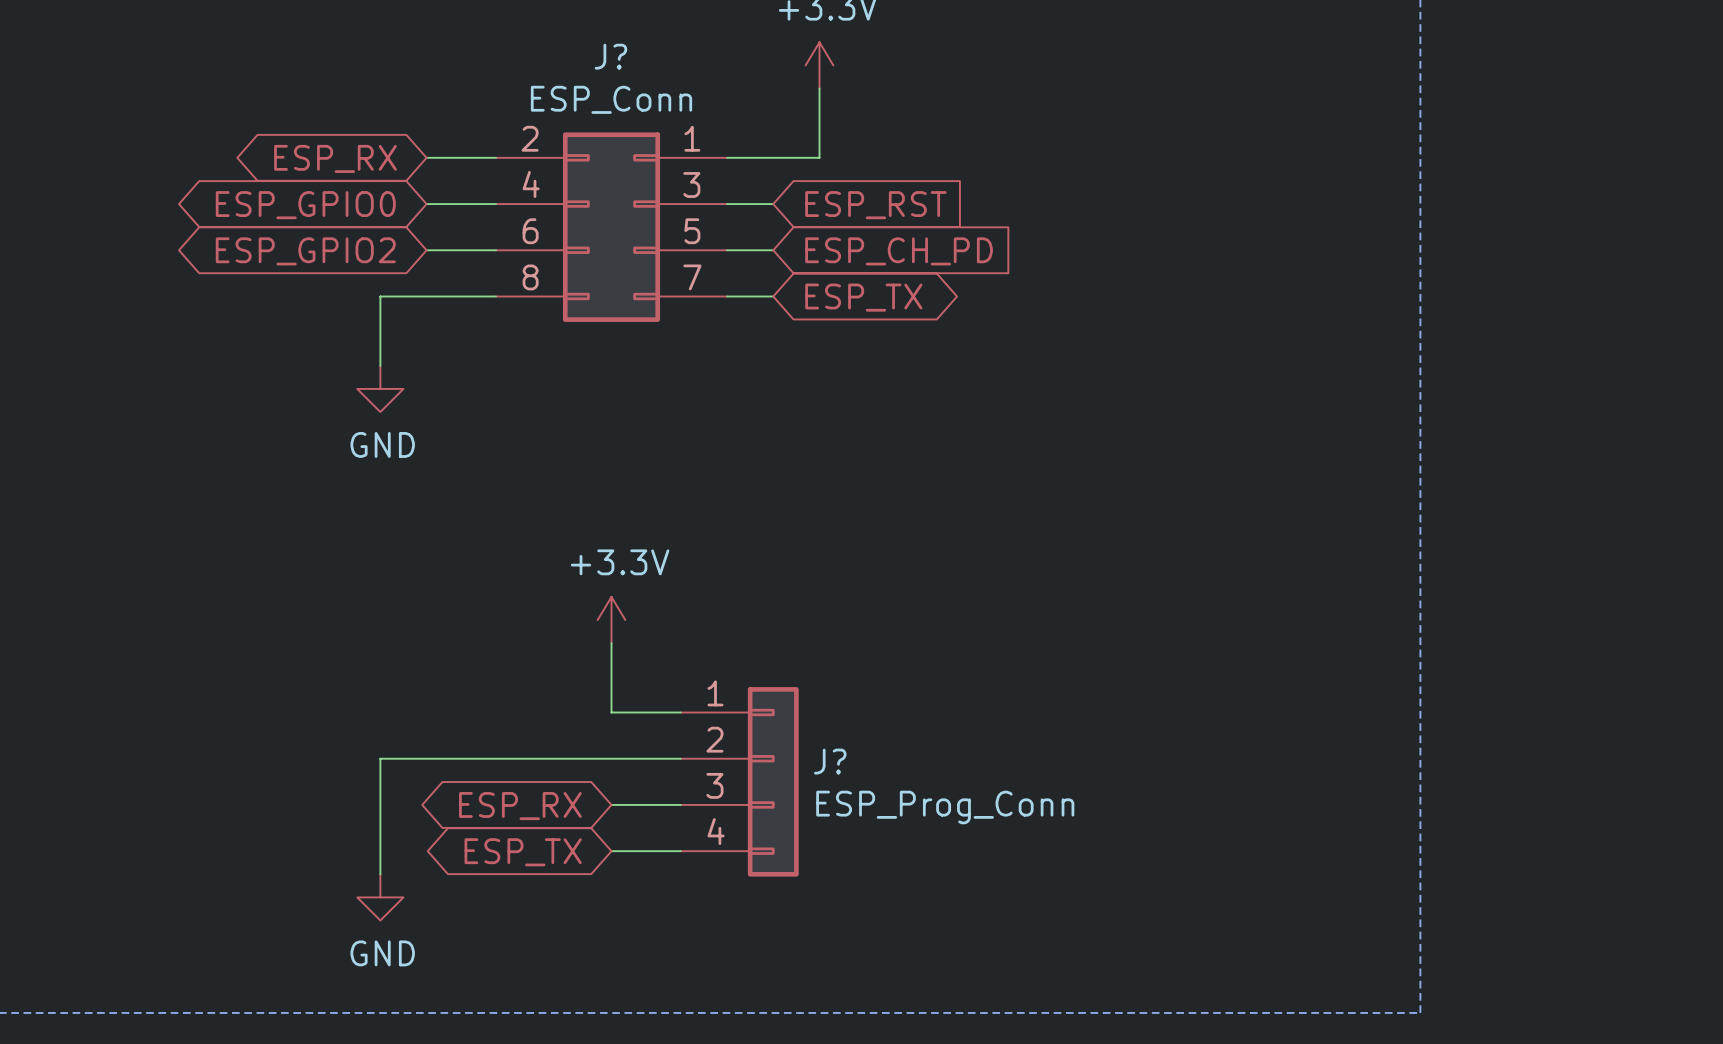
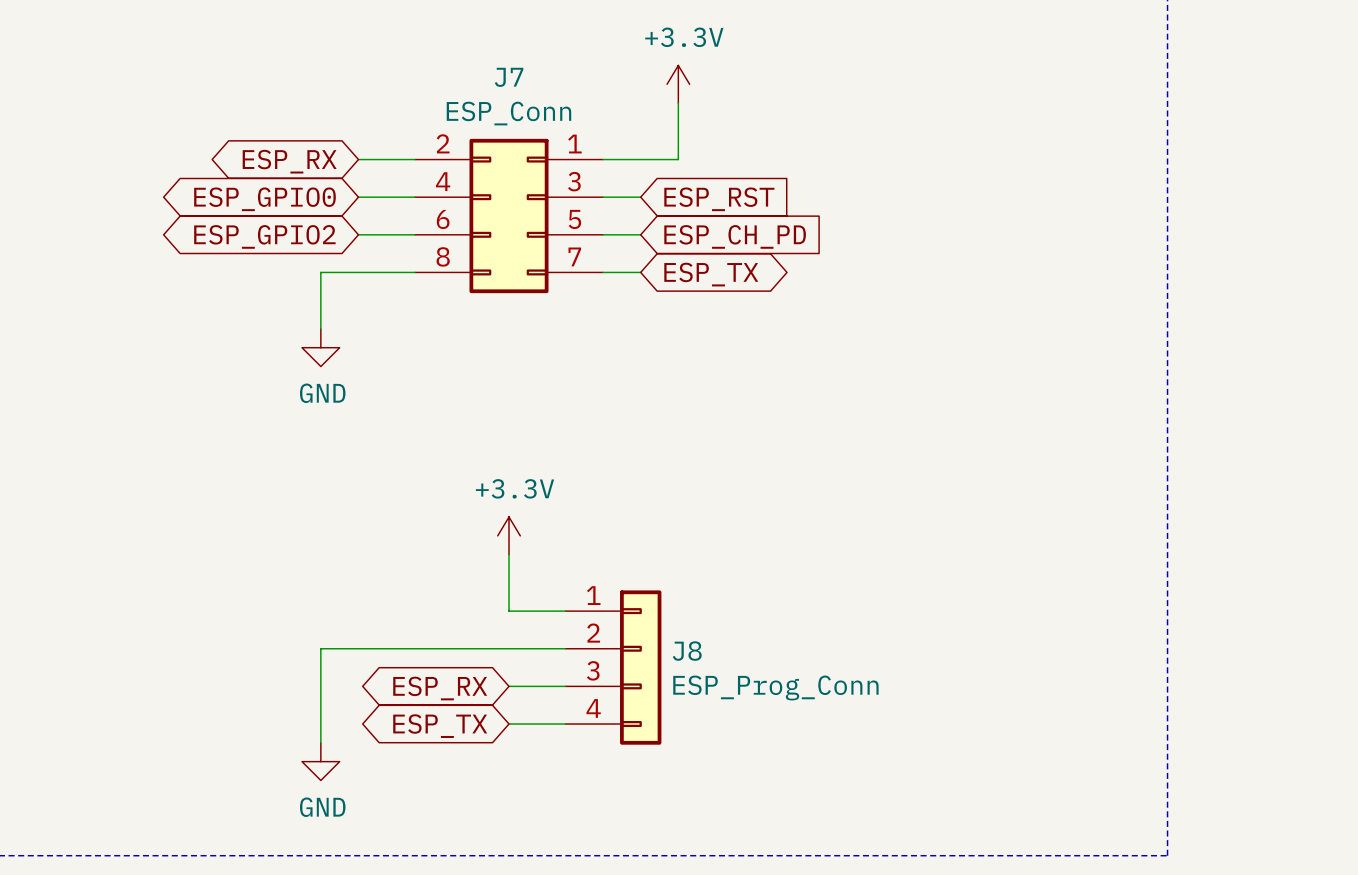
J? name: J? (610, 56) -> J7 (509, 77)
J? name: J? (830, 761) -> J8 (687, 651)

